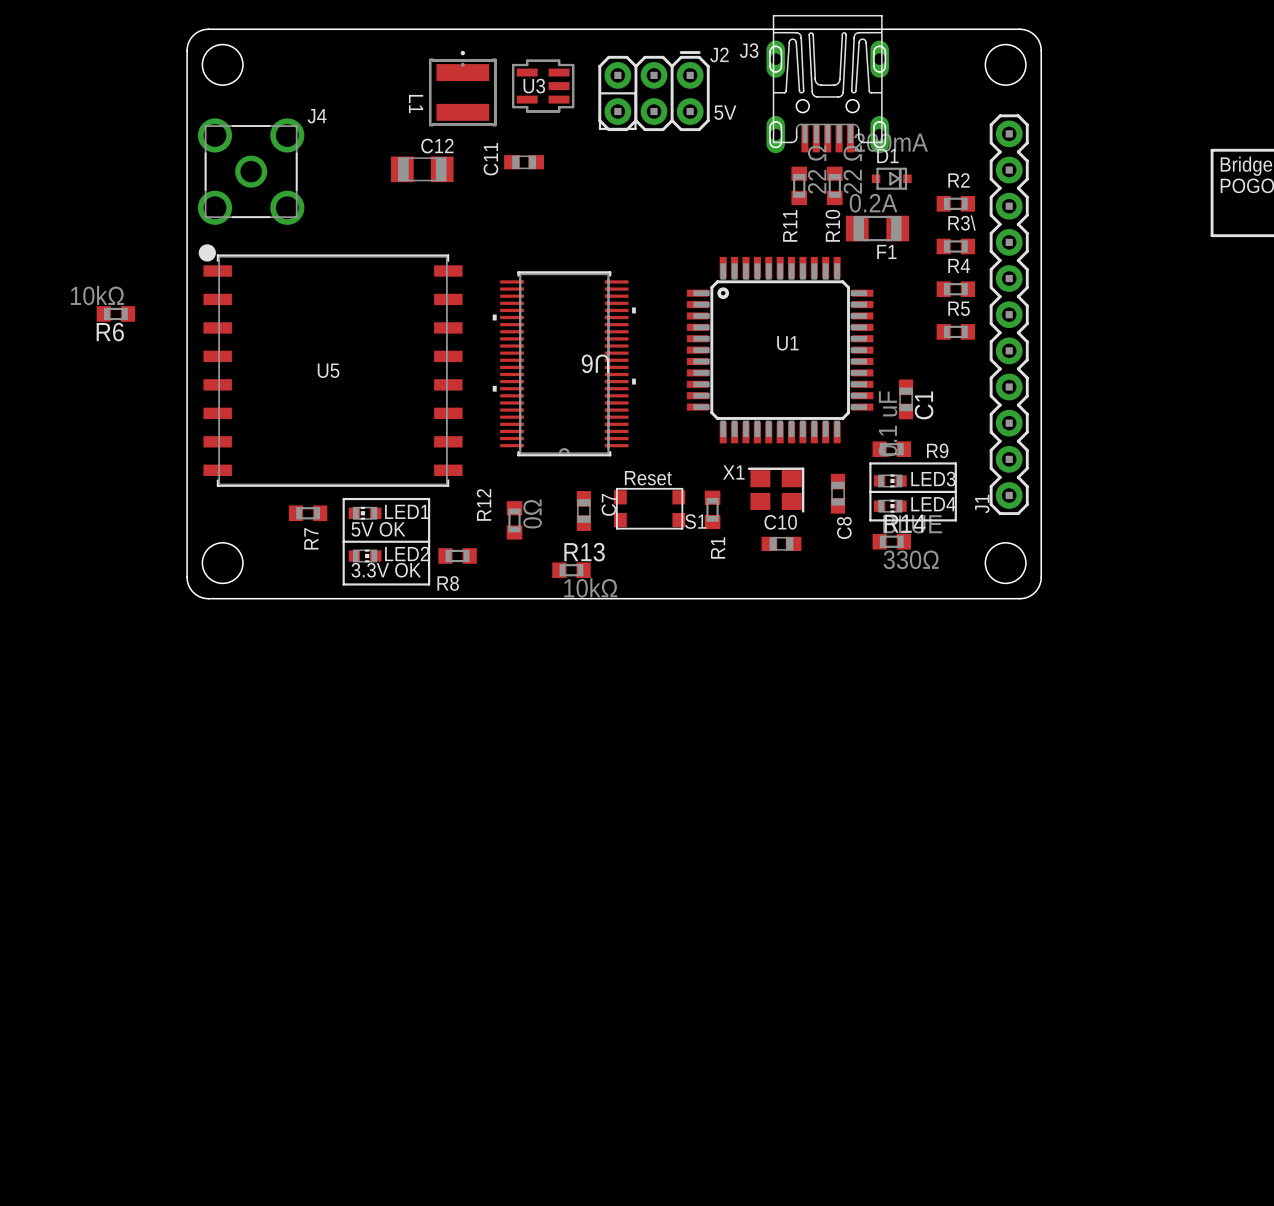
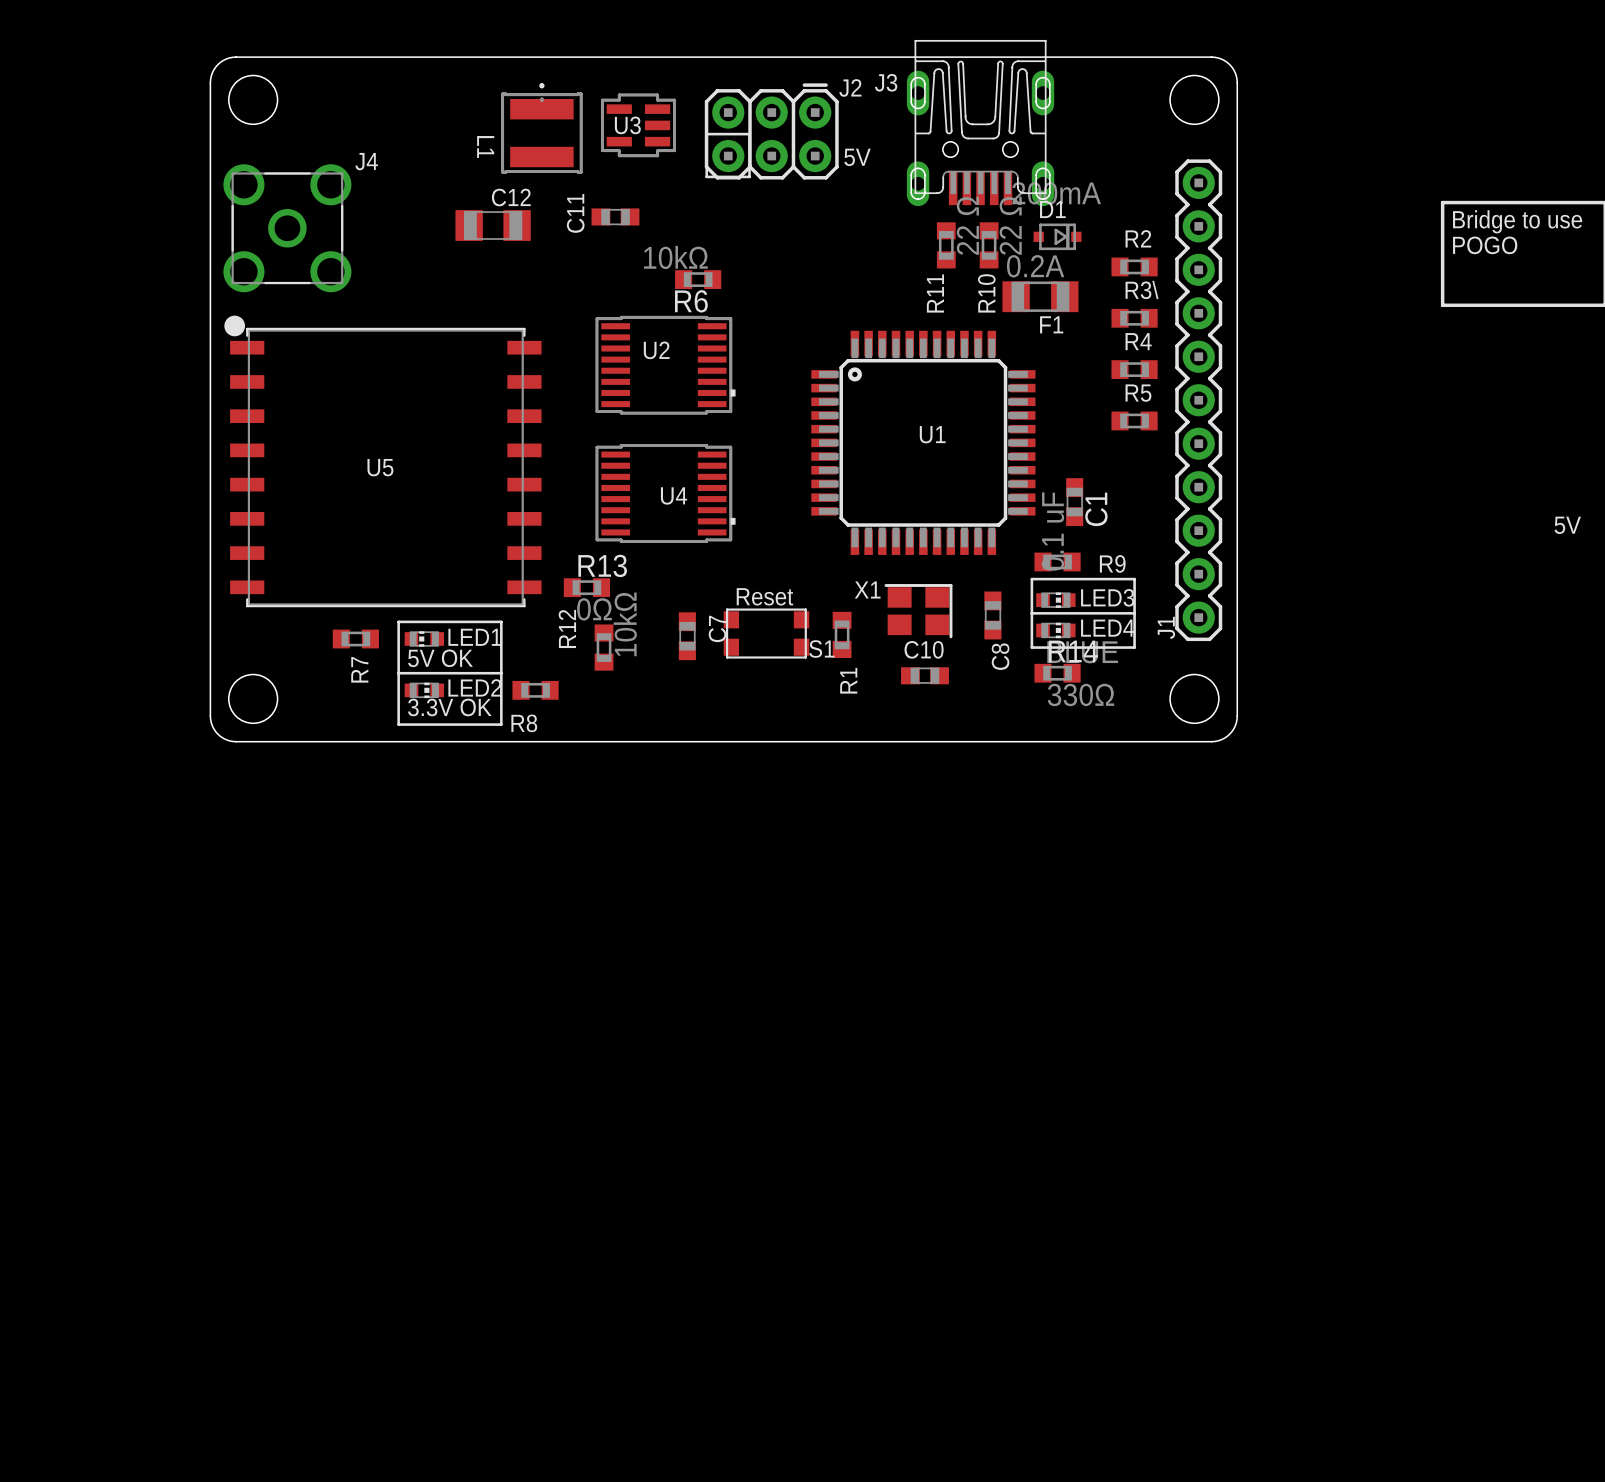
U2: none -> (665, 365)
R6 position: (115, 313) -> (698, 279)
U6: (564, 363) -> none
U4: none -> (665, 493)
R12 value: 0Ω (532, 514) -> 10kΩ (625, 624)
R13 position: (571, 570) -> (586, 587)
R13 value: 10kΩ (590, 587) -> 0Ω (594, 609)

